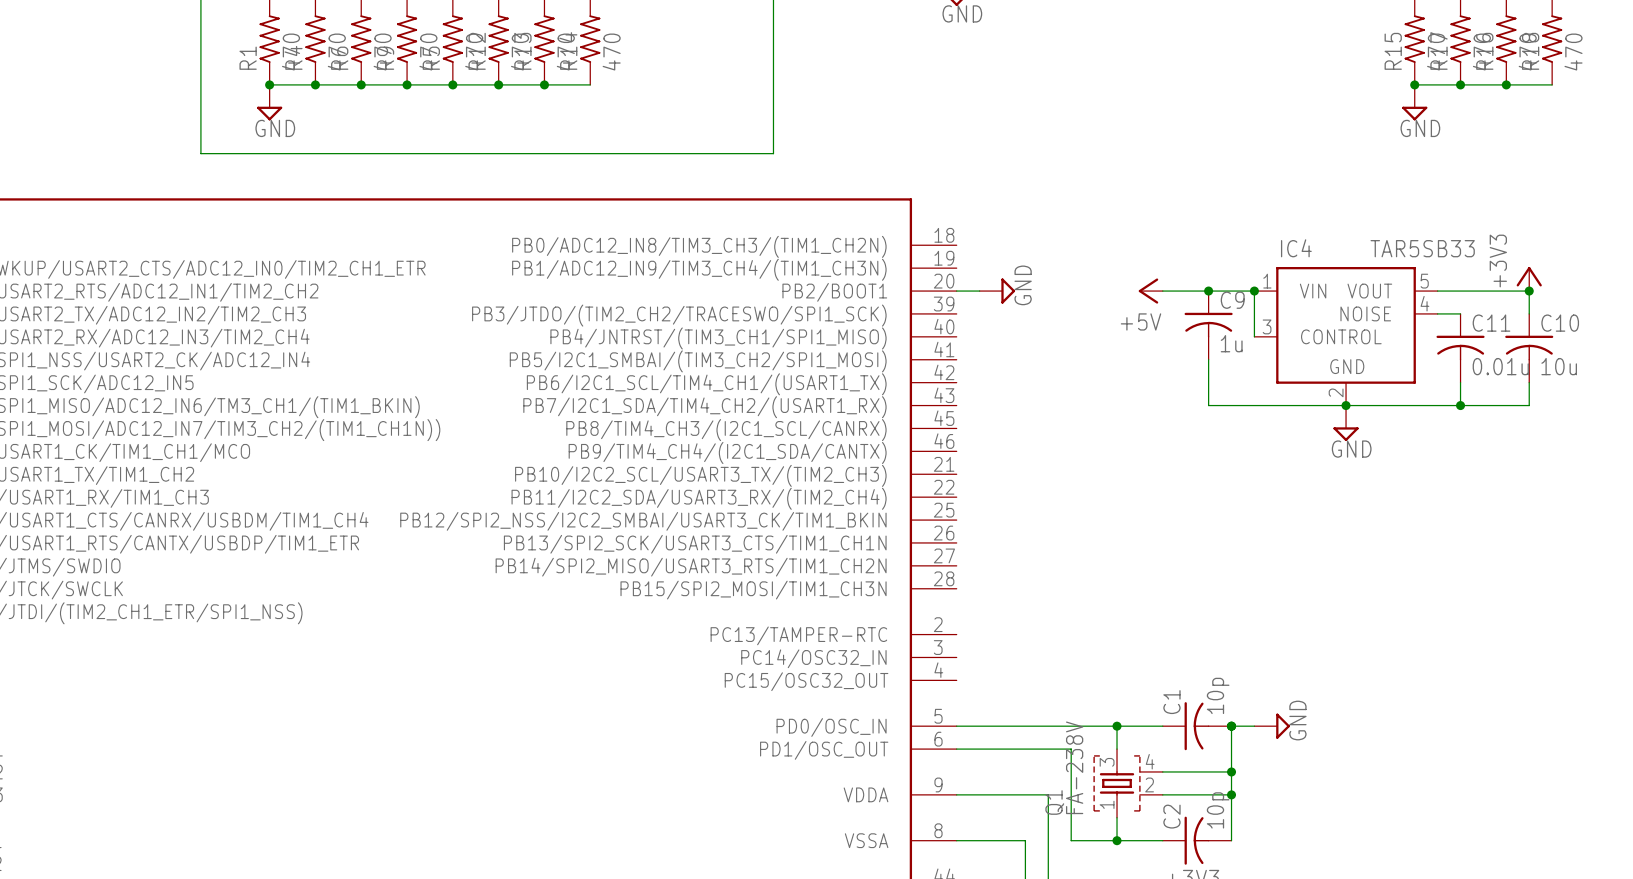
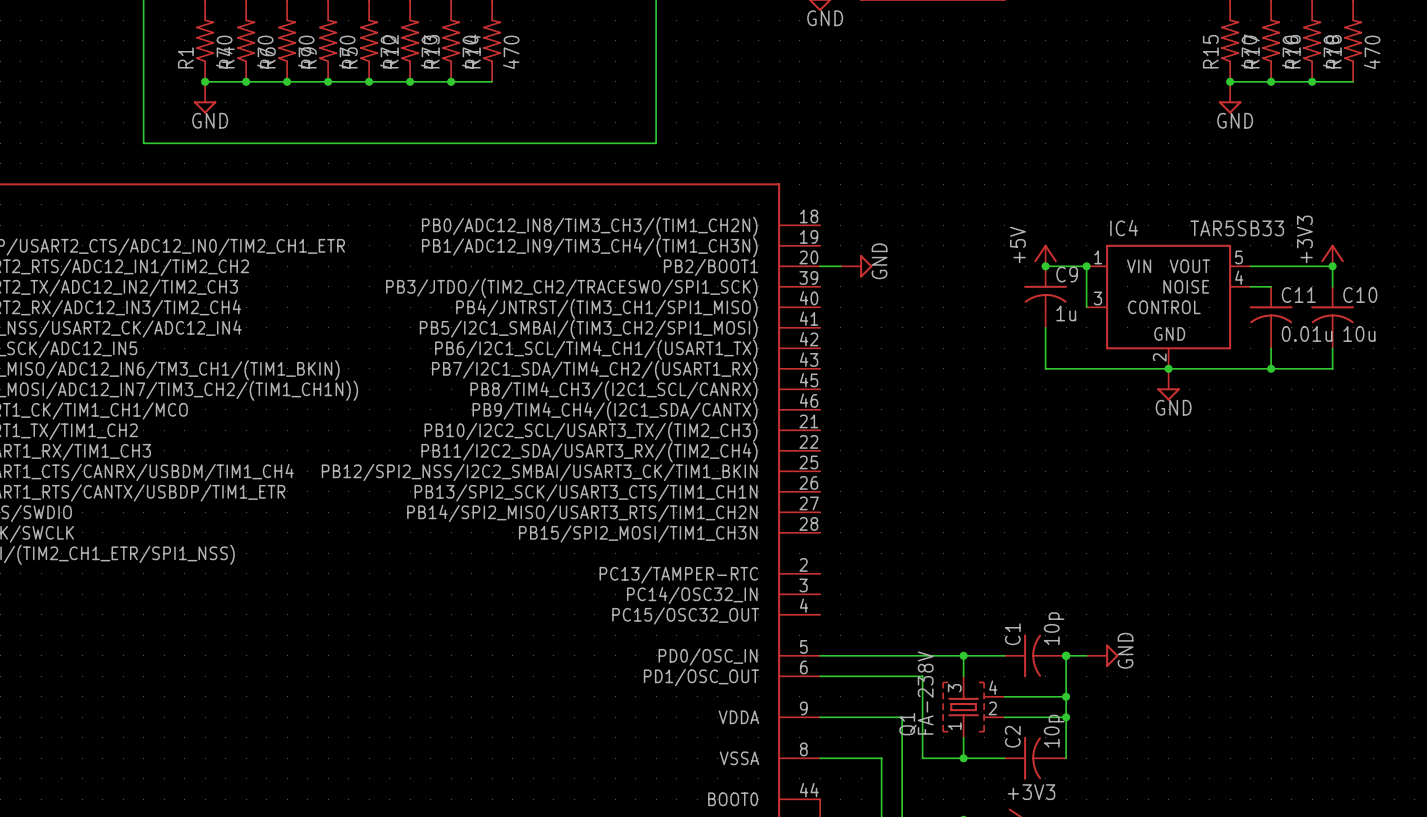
power symbol rotation: 0° (1148, 291) -> 90° clockwise (1045, 253)
power symbol position: +5V (1150, 291) -> +5V (1045, 255)
wire: (1162, 291) (1208, 291) -> none

